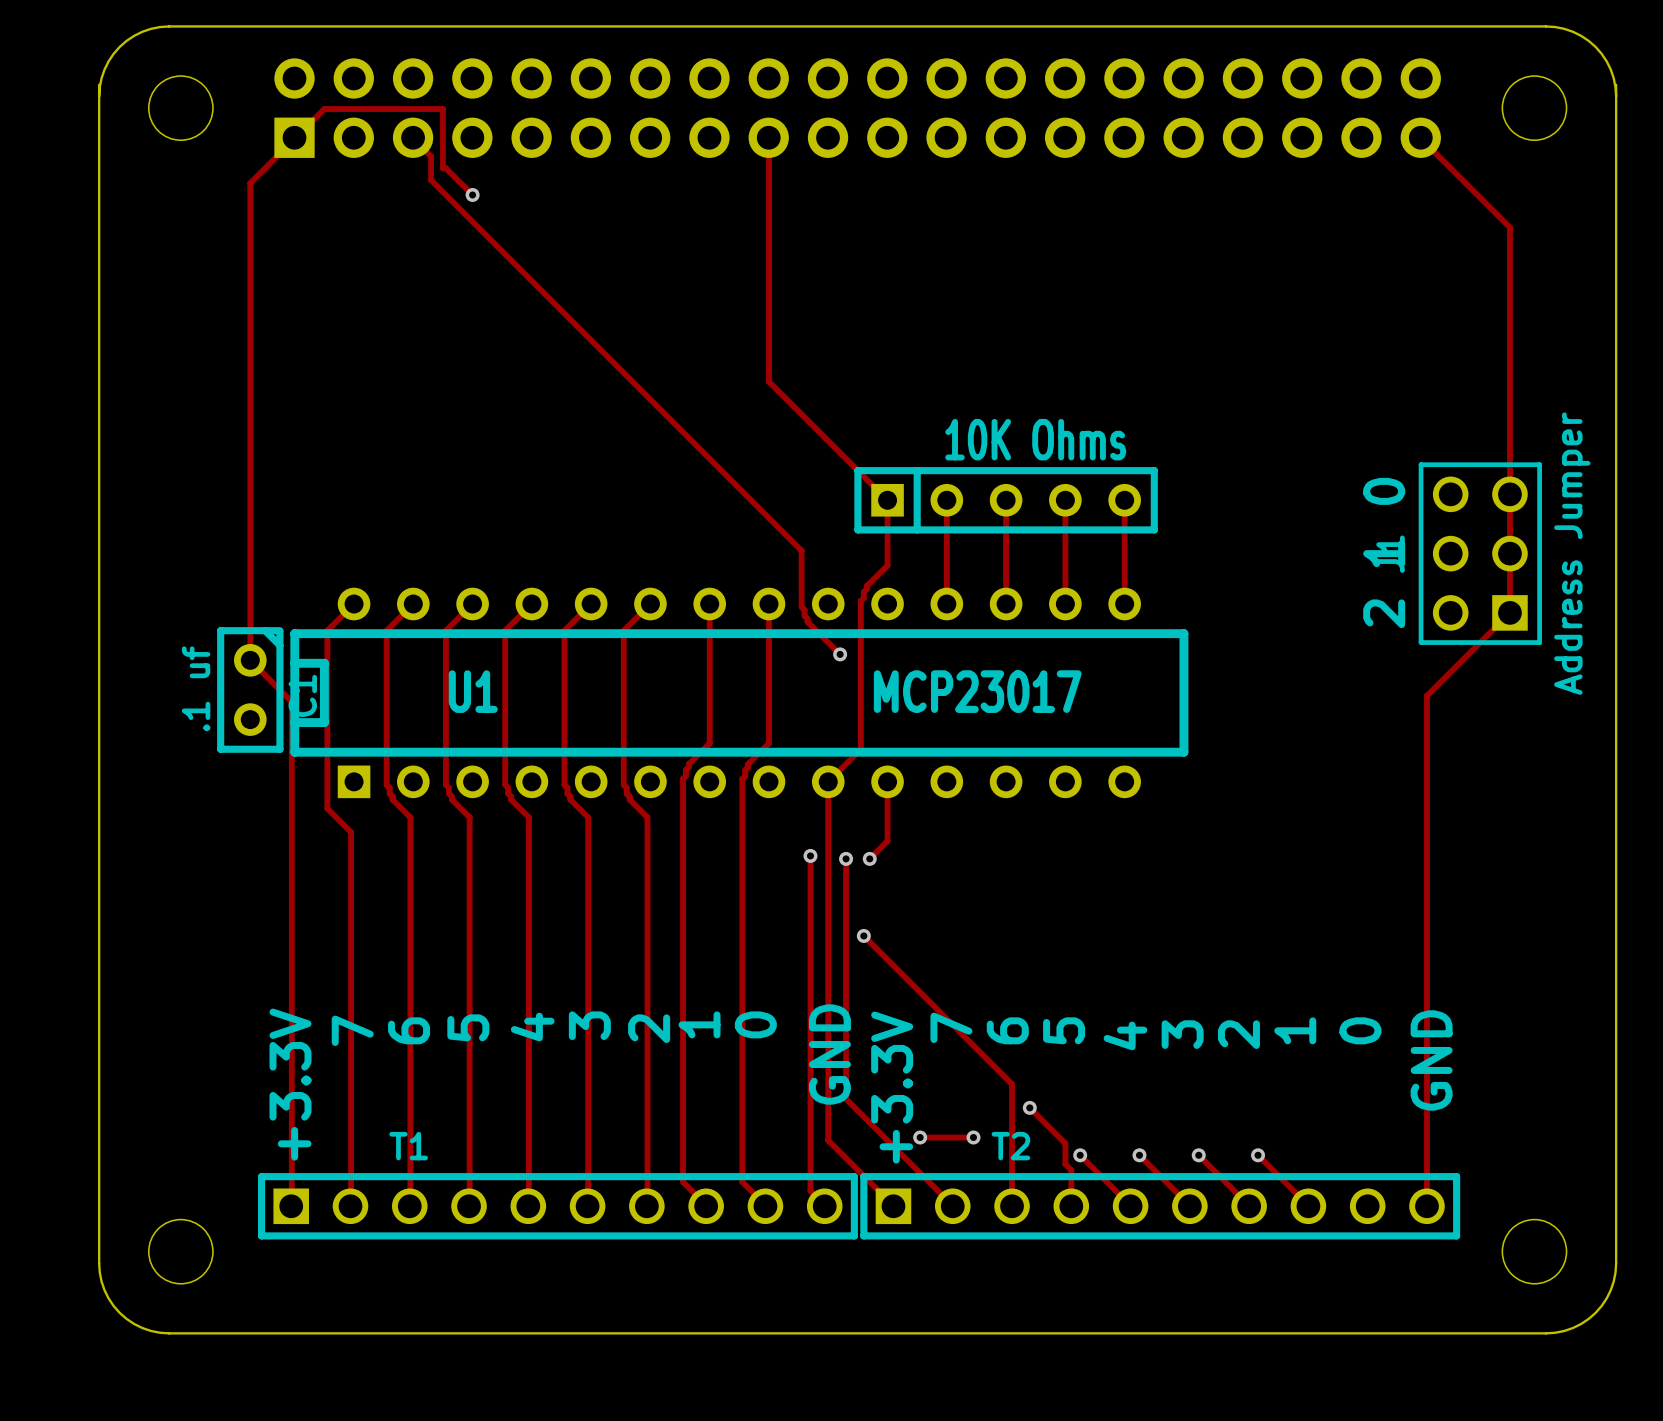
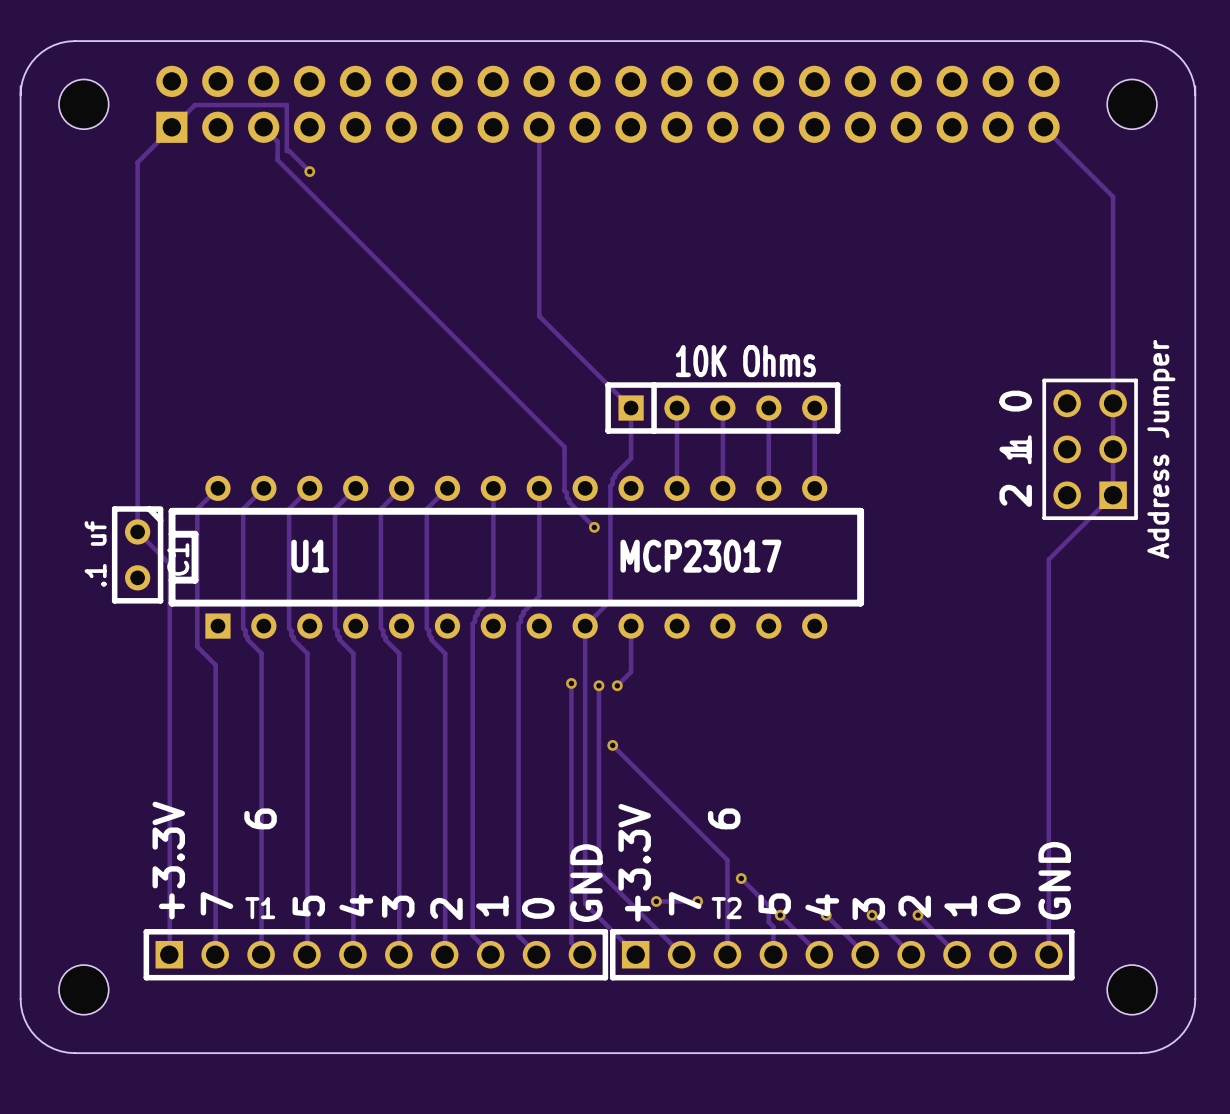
text position: 1 (699, 1024) -> 1 (492, 906)
text position: 0 (755, 1024) -> 0 (538, 908)
text position: 3 (589, 1025) -> 3 (398, 906)
text position: 5 (468, 1027) -> 5 (308, 906)
text position: 4 (532, 1027) -> 4 (356, 905)
text position: 7 (951, 1027) -> 7 (685, 903)
text position: 2 (649, 1028) -> 2 (446, 909)
text position: 7 (352, 1030) -> 7 (216, 903)
text position: 5 (1064, 1030) -> 5 (774, 903)
text position: 1 (1295, 1030) -> 1 (960, 906)
text position: 0 (1360, 1030) -> 0 (1004, 903)
text position: 3 (1182, 1034) -> 3 (868, 909)
text position: 2 (1238, 1034) -> 2 (914, 906)
text position: 4 (1125, 1035) -> 4 (822, 905)
text position: GND (829, 1054) -> GND (586, 883)
text position: GND (1431, 1060) -> GND (1054, 880)

